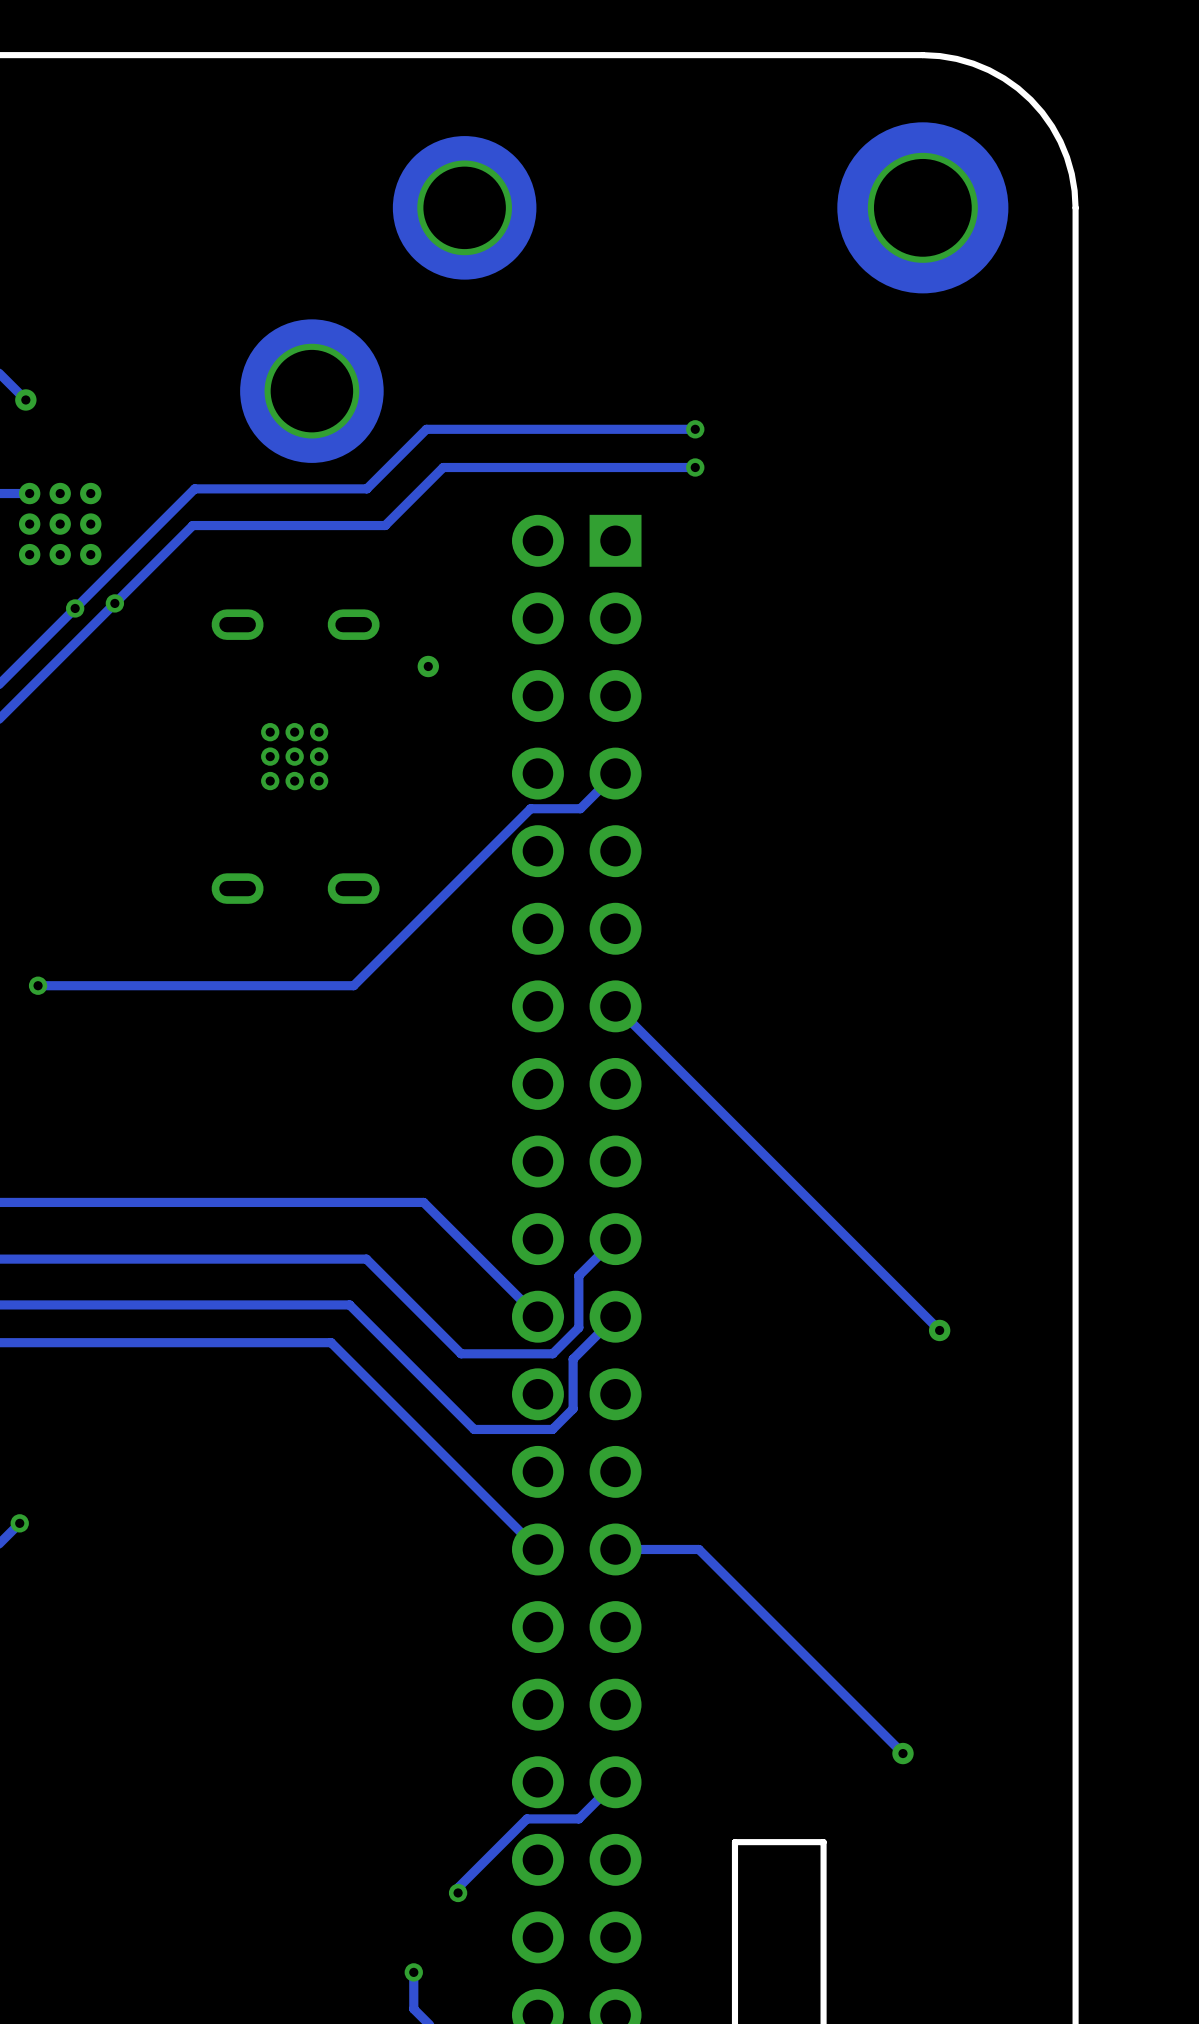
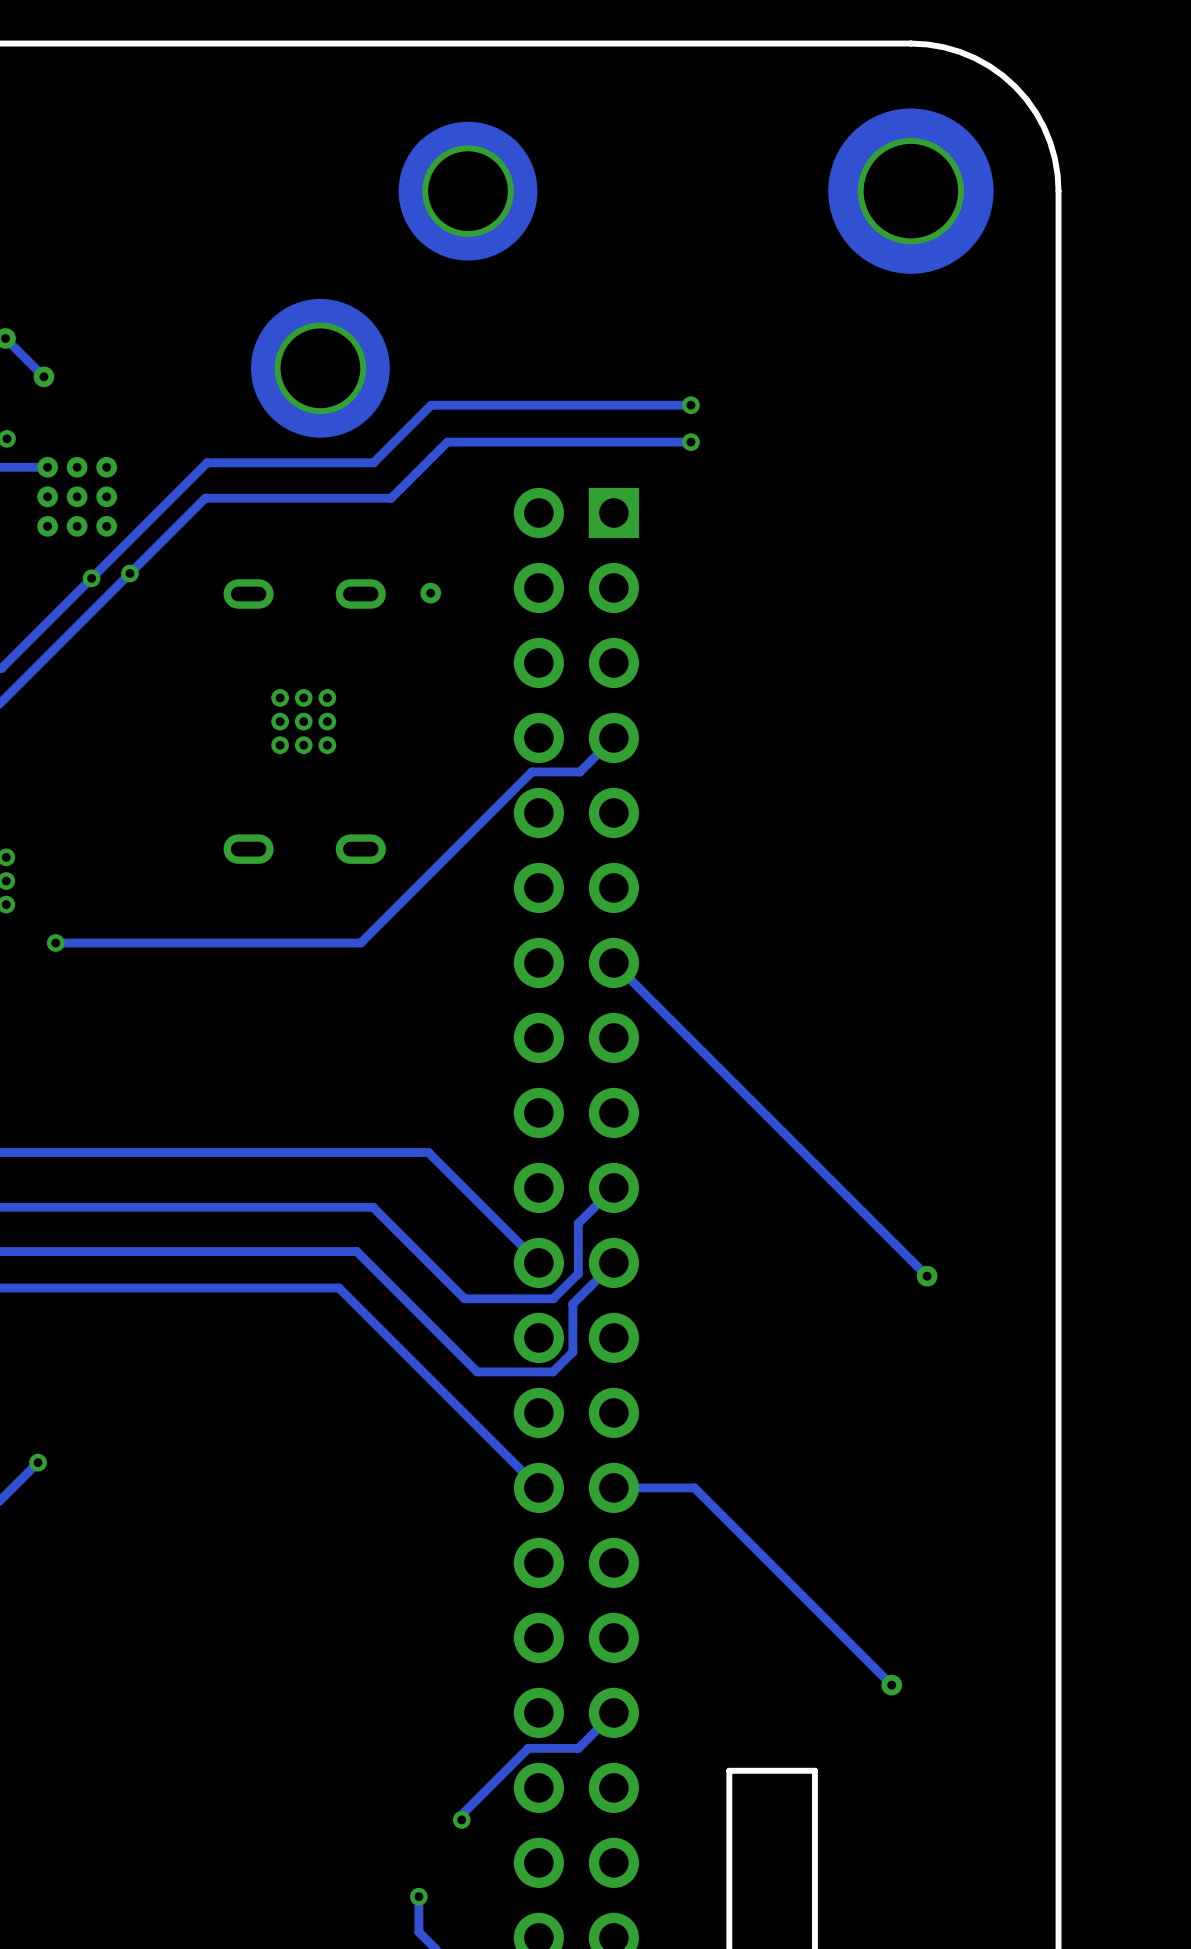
via position: (428, 666) -> (430, 593)

